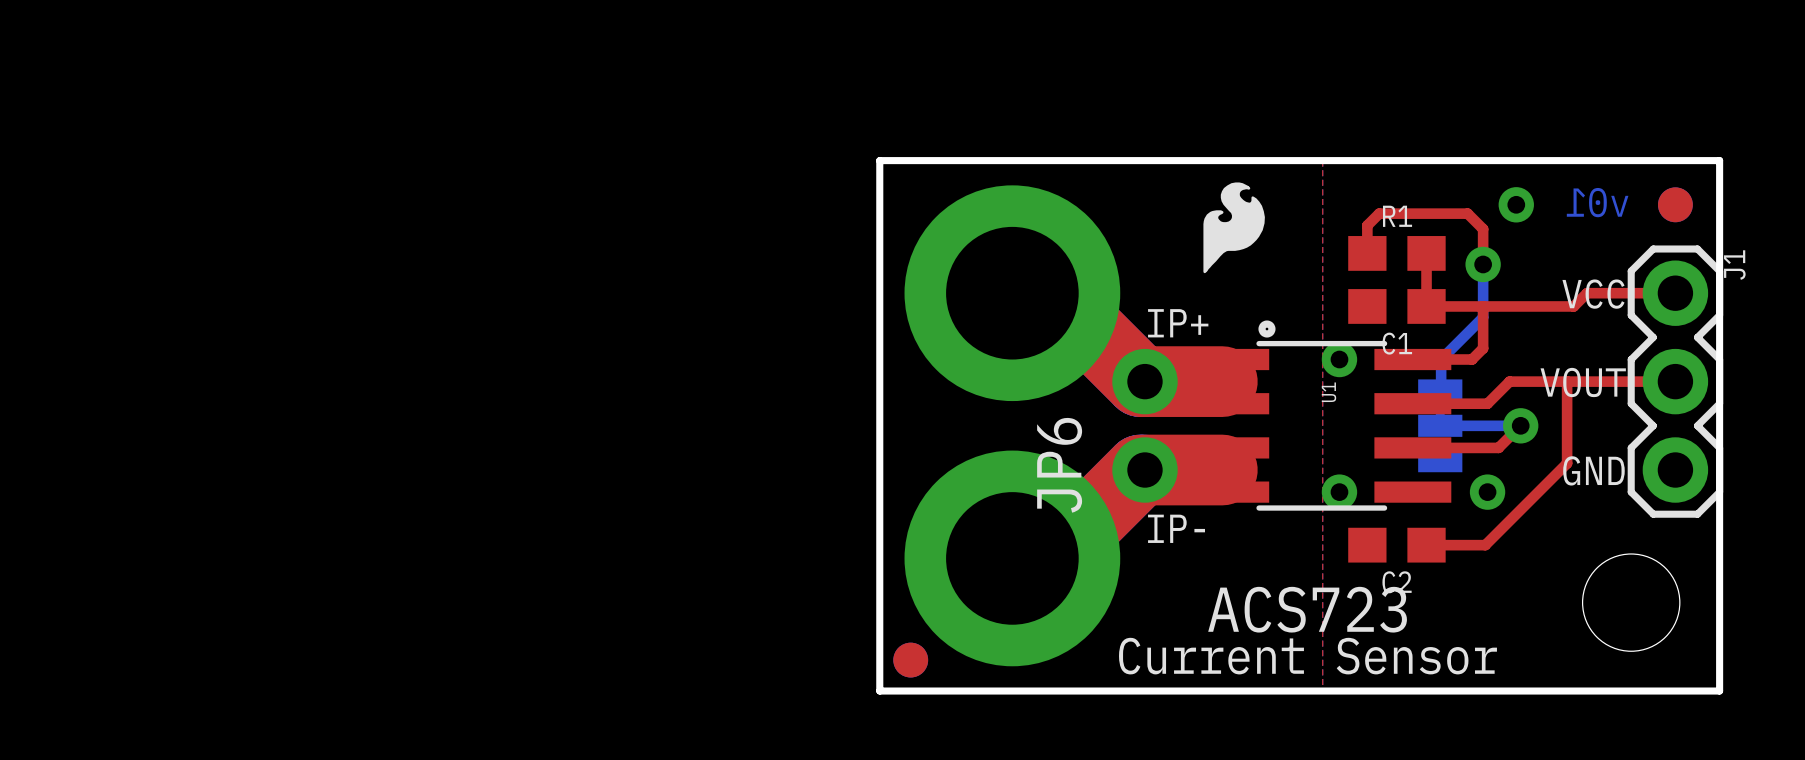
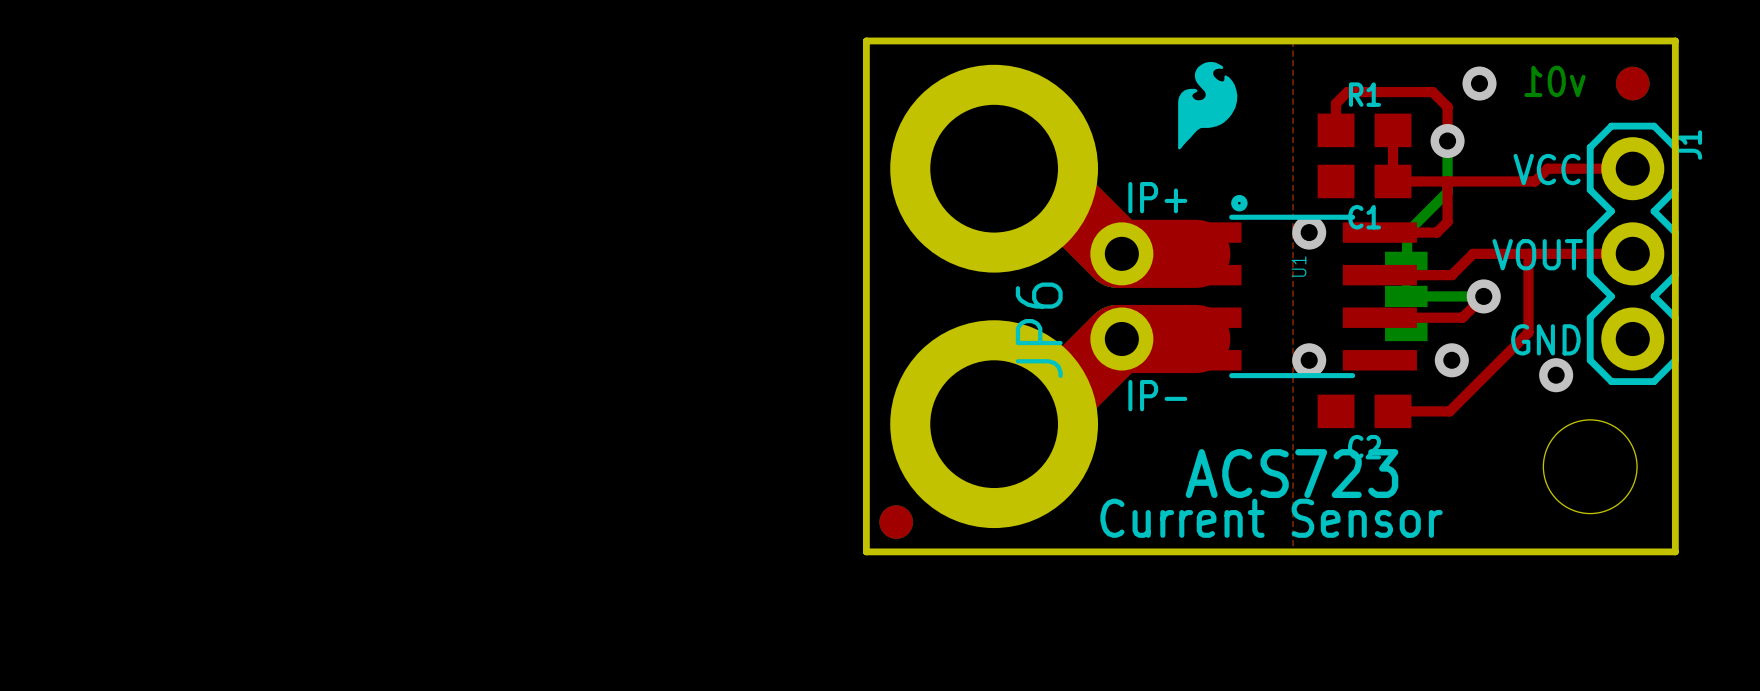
via: none -> (1556, 375)

